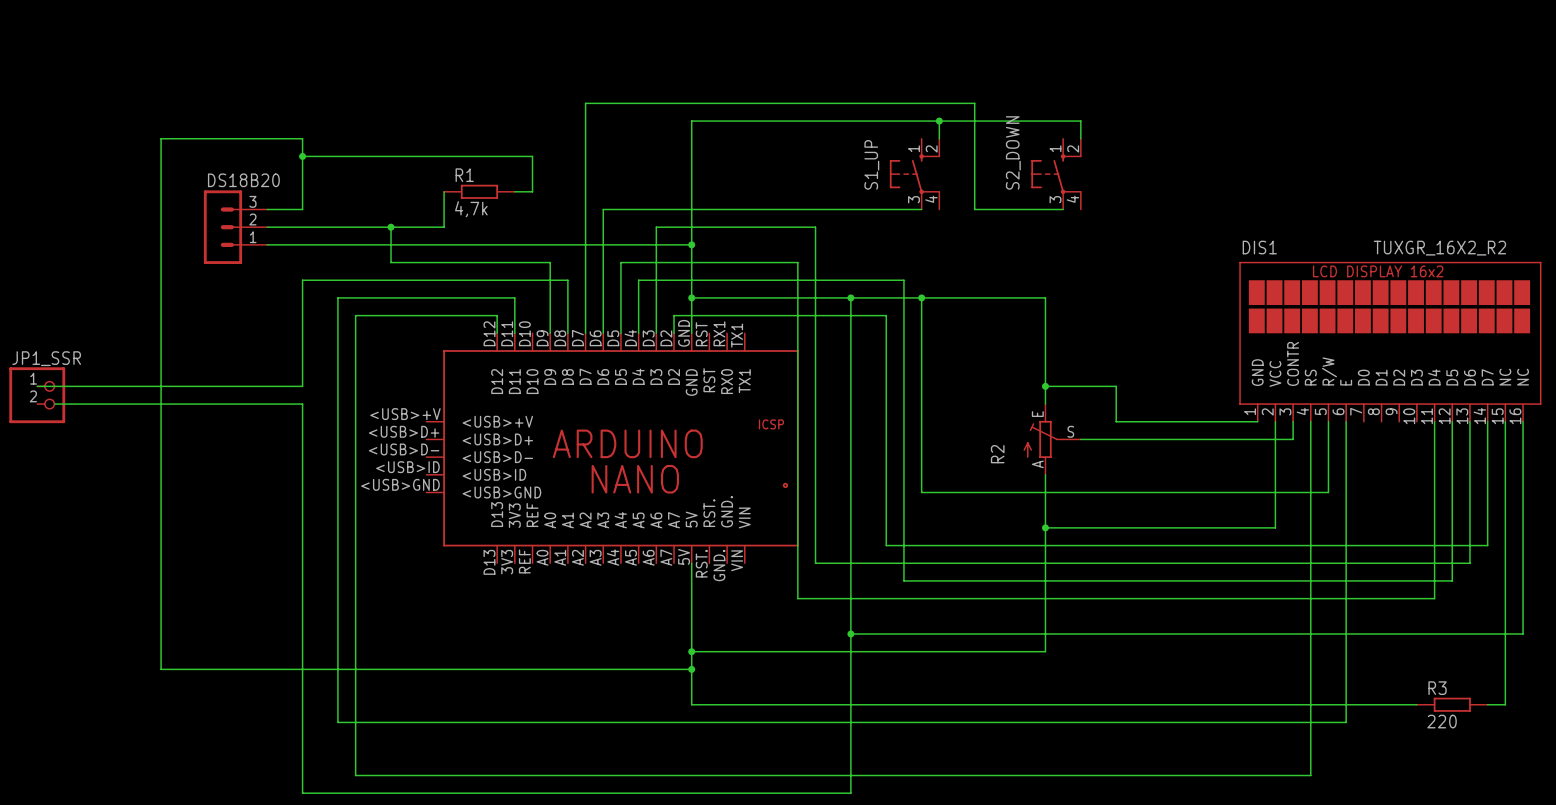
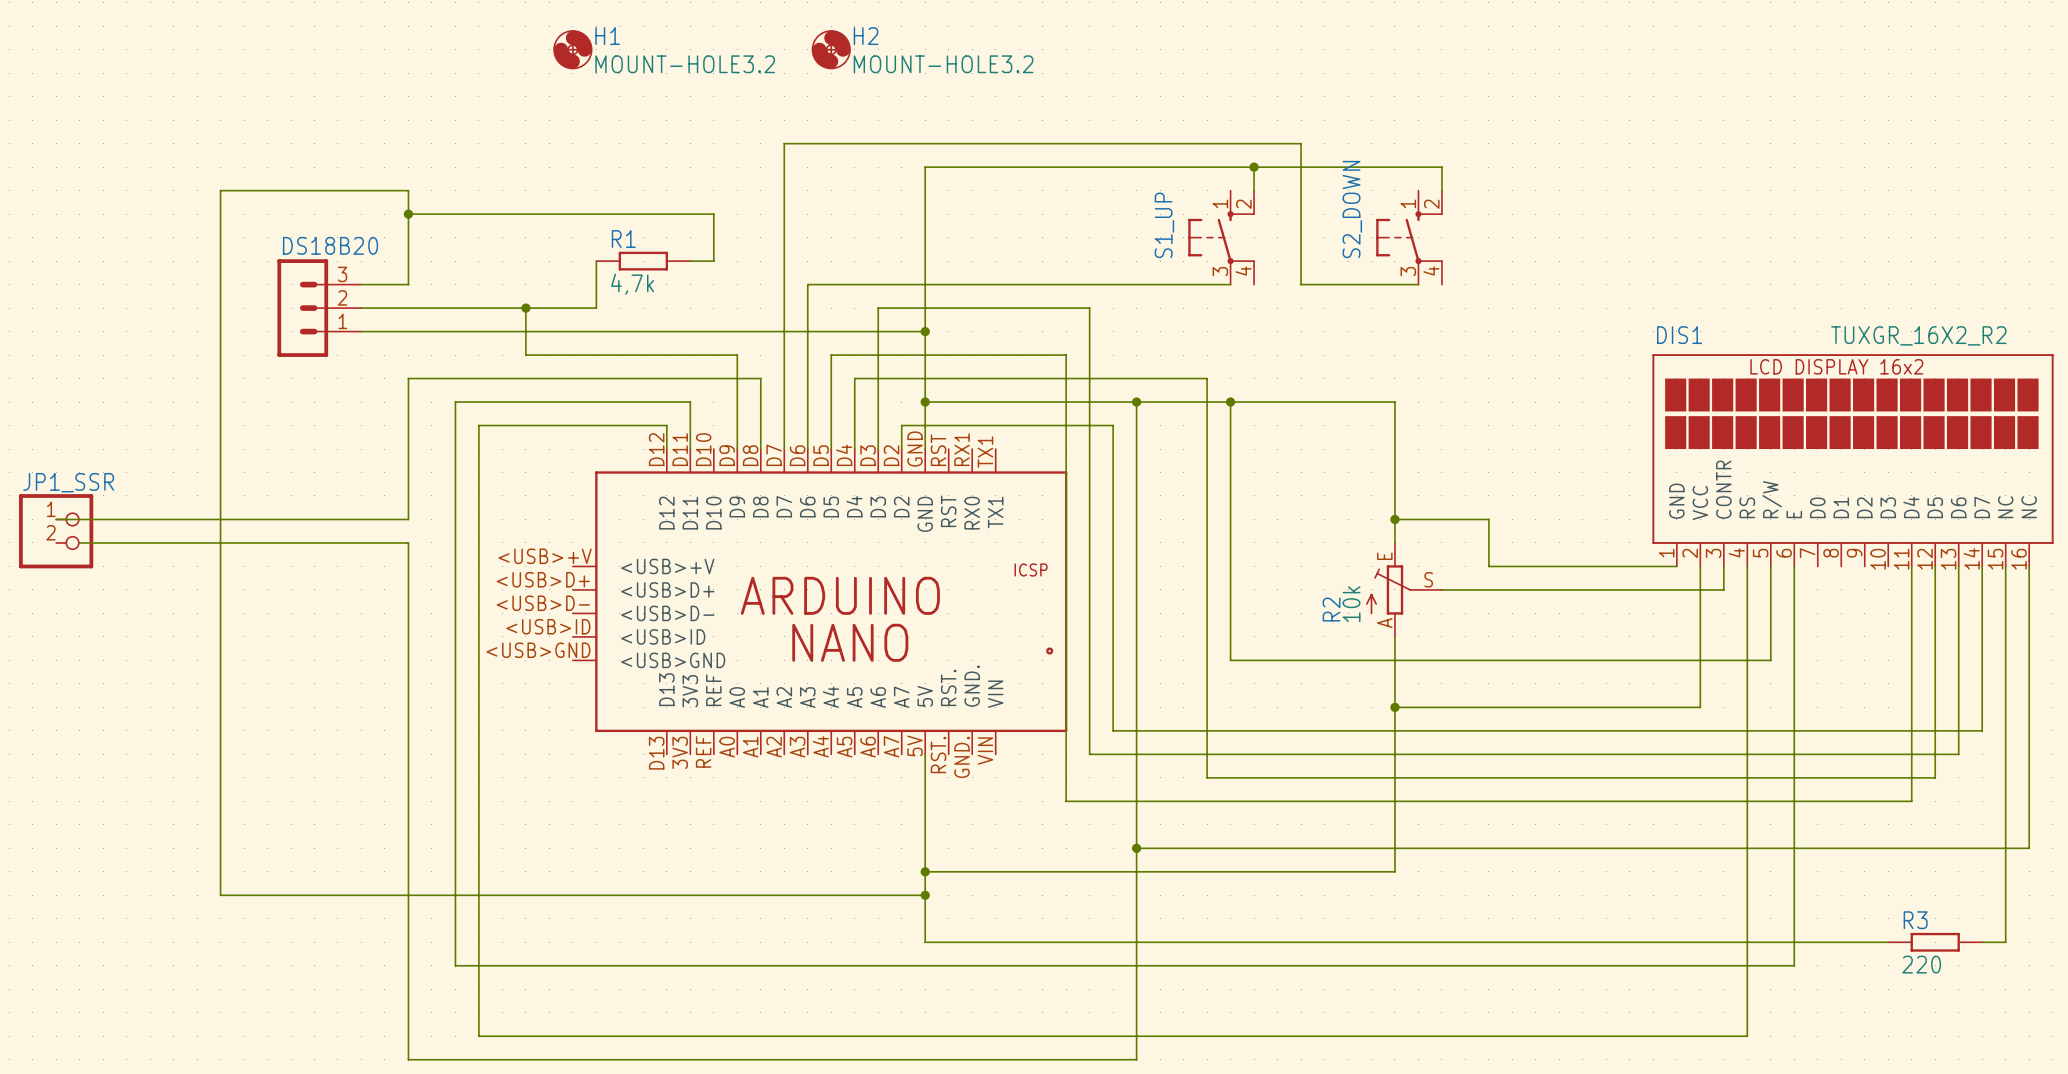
H1: none -> MOUNT-HOLE3.2 (572, 49)
H2: none -> MOUNT-HOLE3.2 (831, 49)
wire: (833, 315) (886, 315) (886, 545) -> (1113, 425) (1113, 730) (1183, 730)
R2 value: none -> 10k (1351, 604)

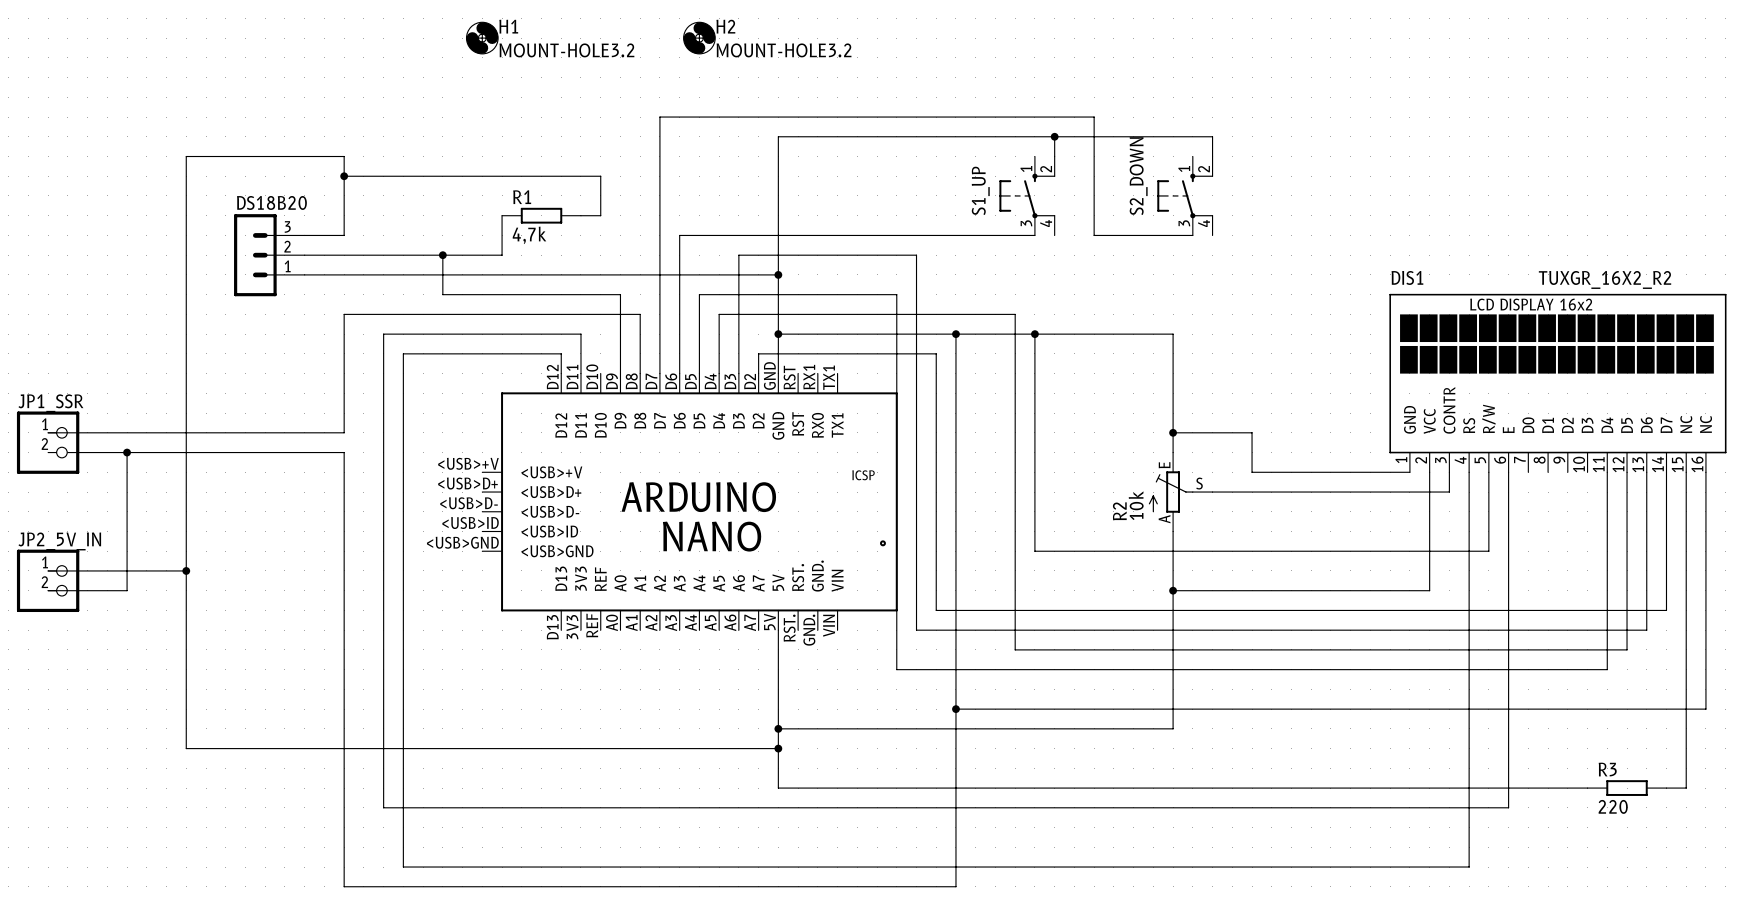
wire: none -> (127, 452) (127, 590) (48, 590)
junction: none -> (127, 452)
wire: none -> (48, 570) (186, 570)
junction: none -> (186, 570)
JP2_5V_IN: none -> (48, 580)

